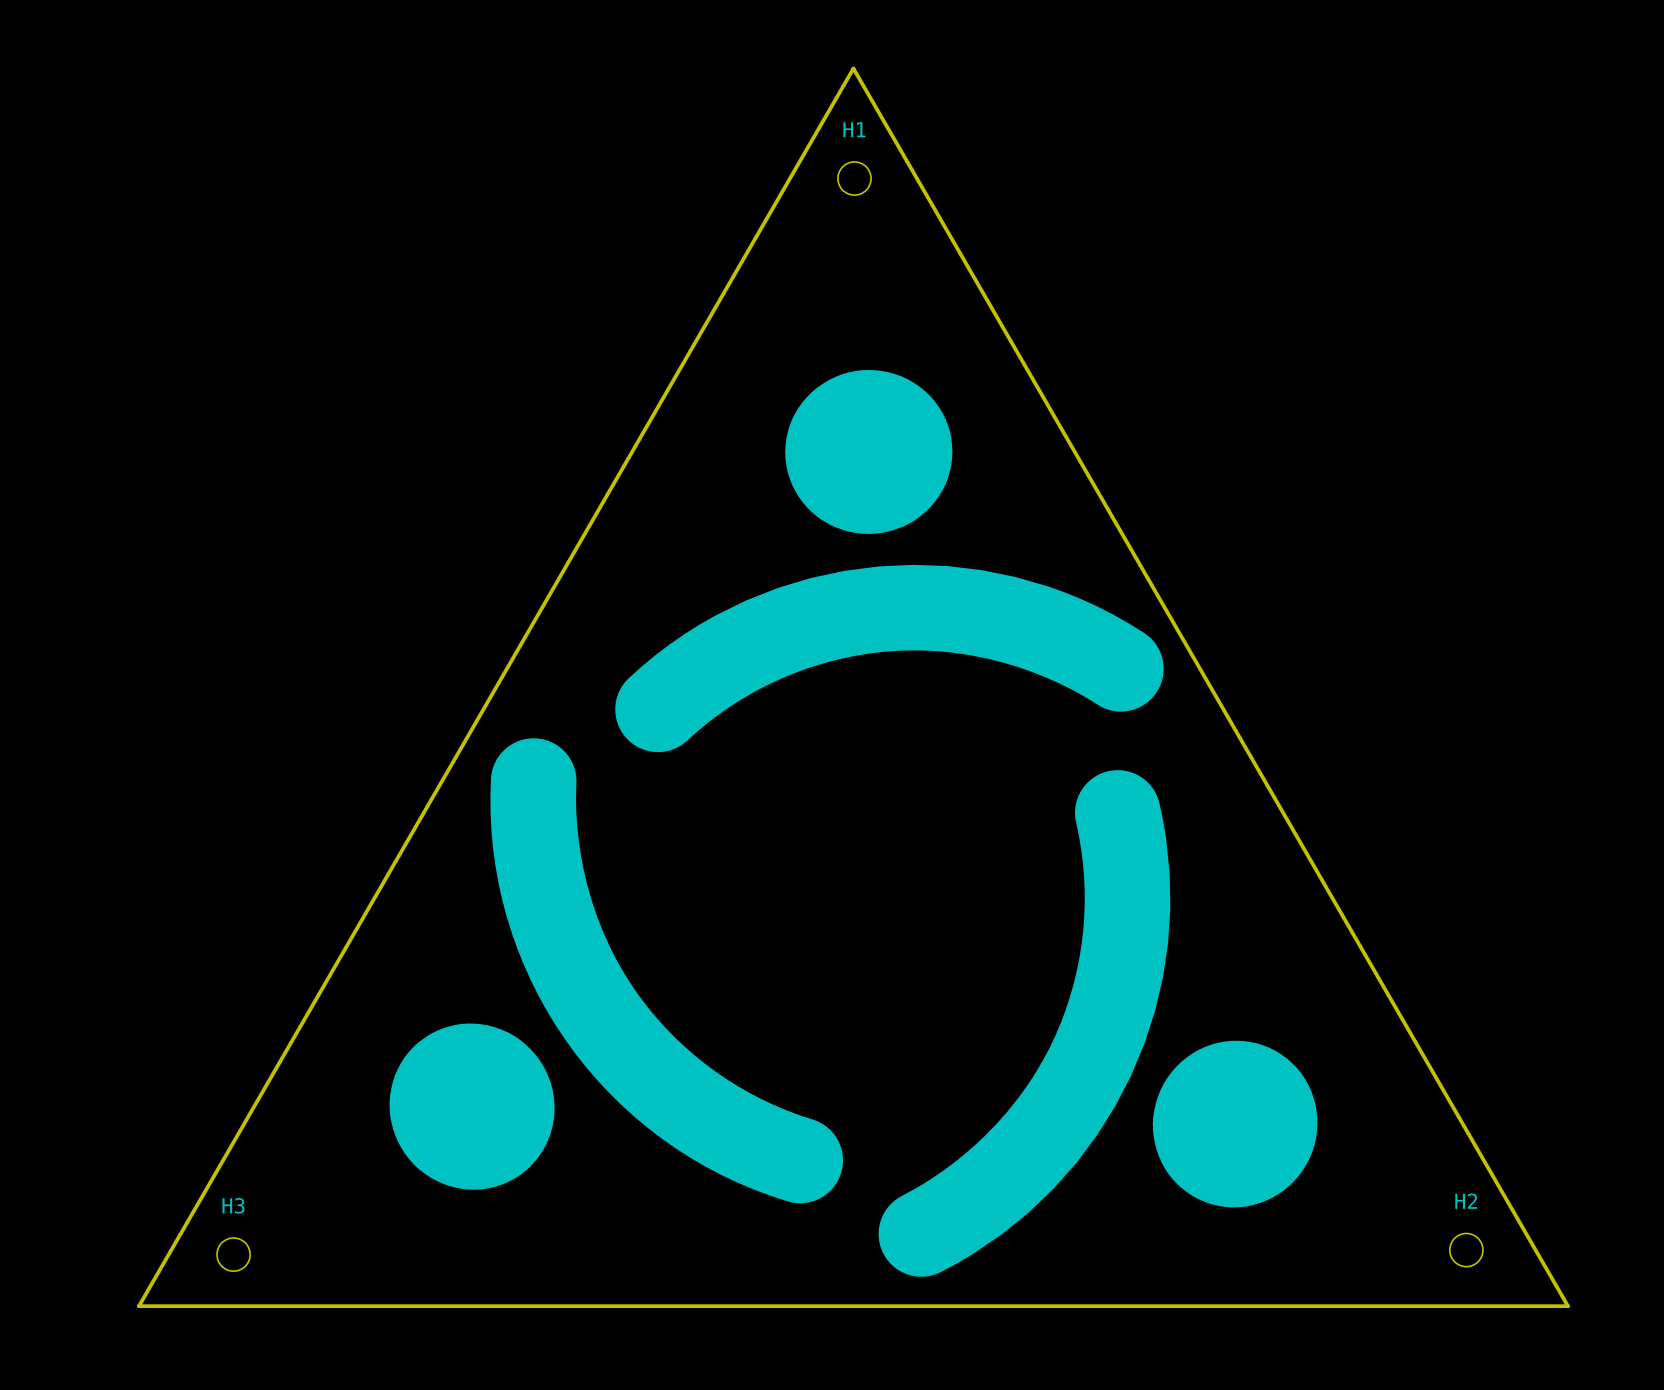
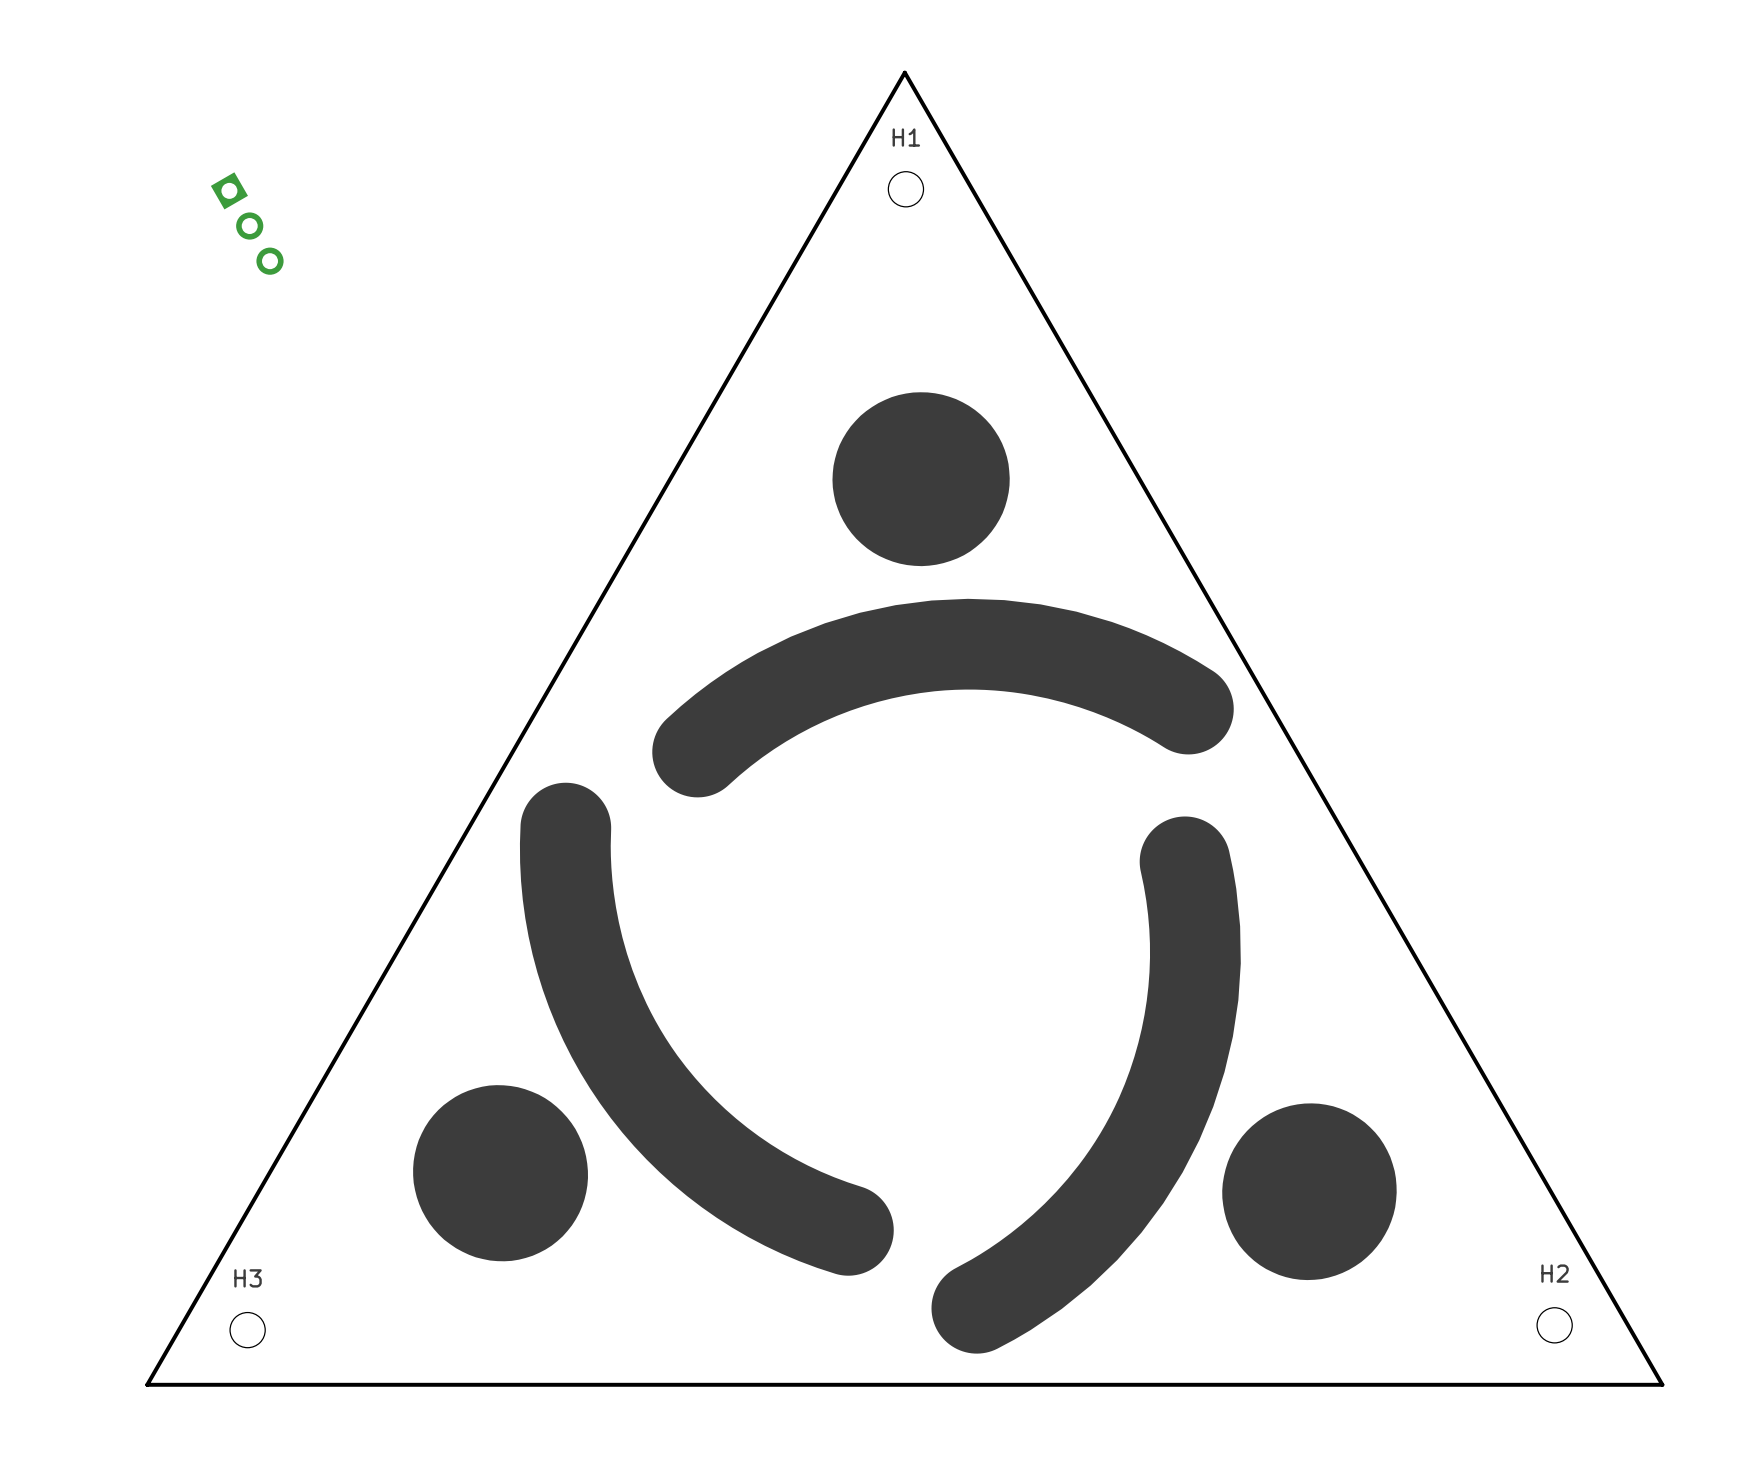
part: none -> (247, 223)

